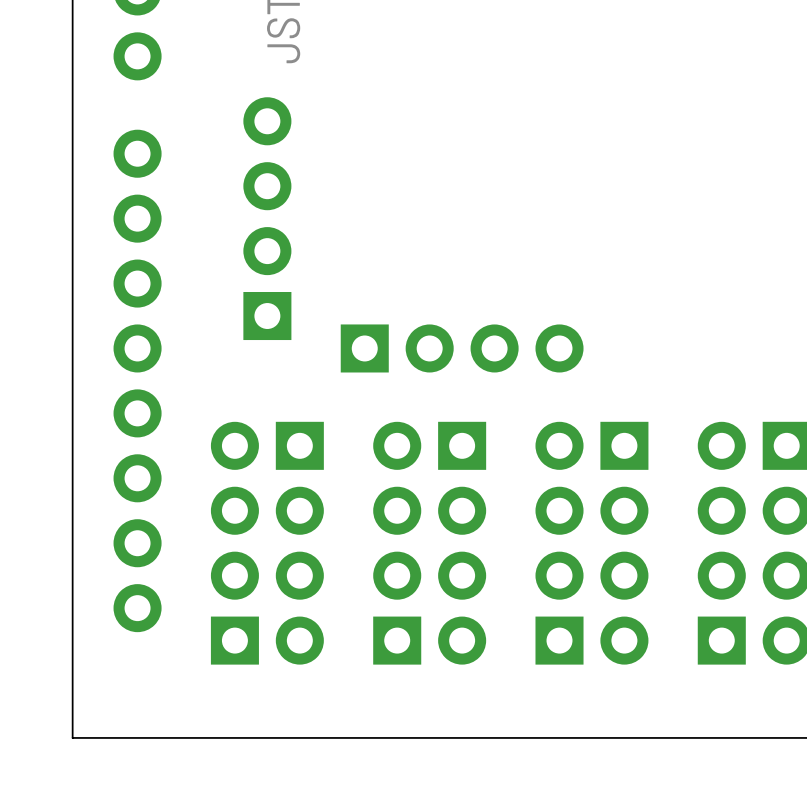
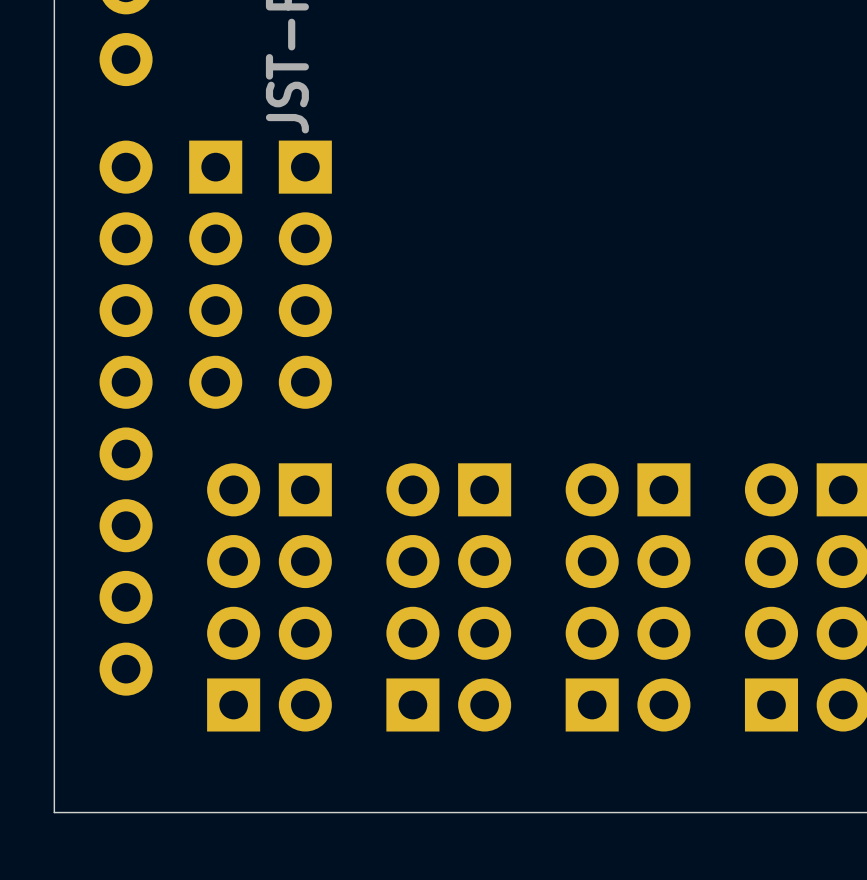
part: (267, 218) -> none
part: none -> (215, 274)
part: none -> (305, 274)
part: (462, 348) -> none

